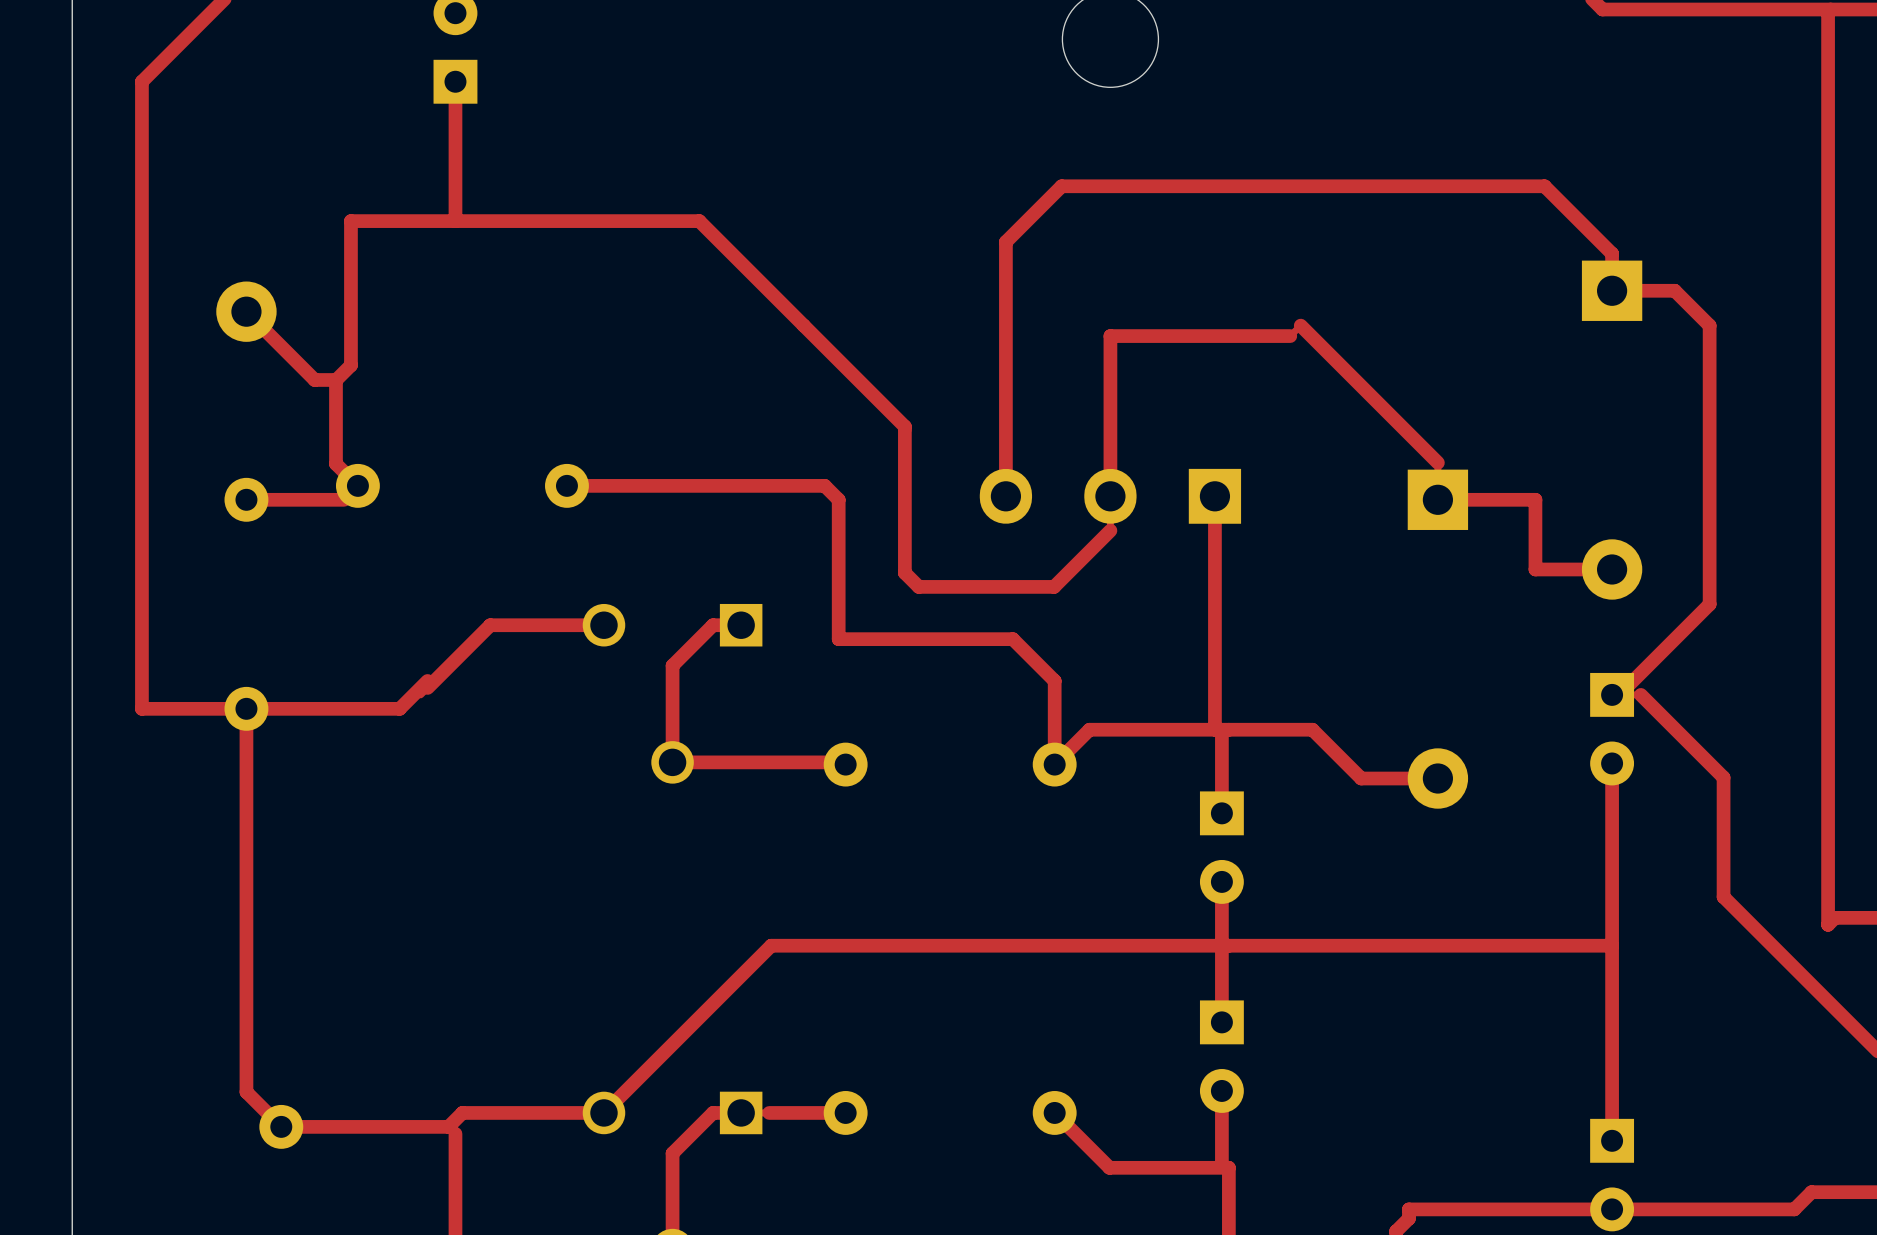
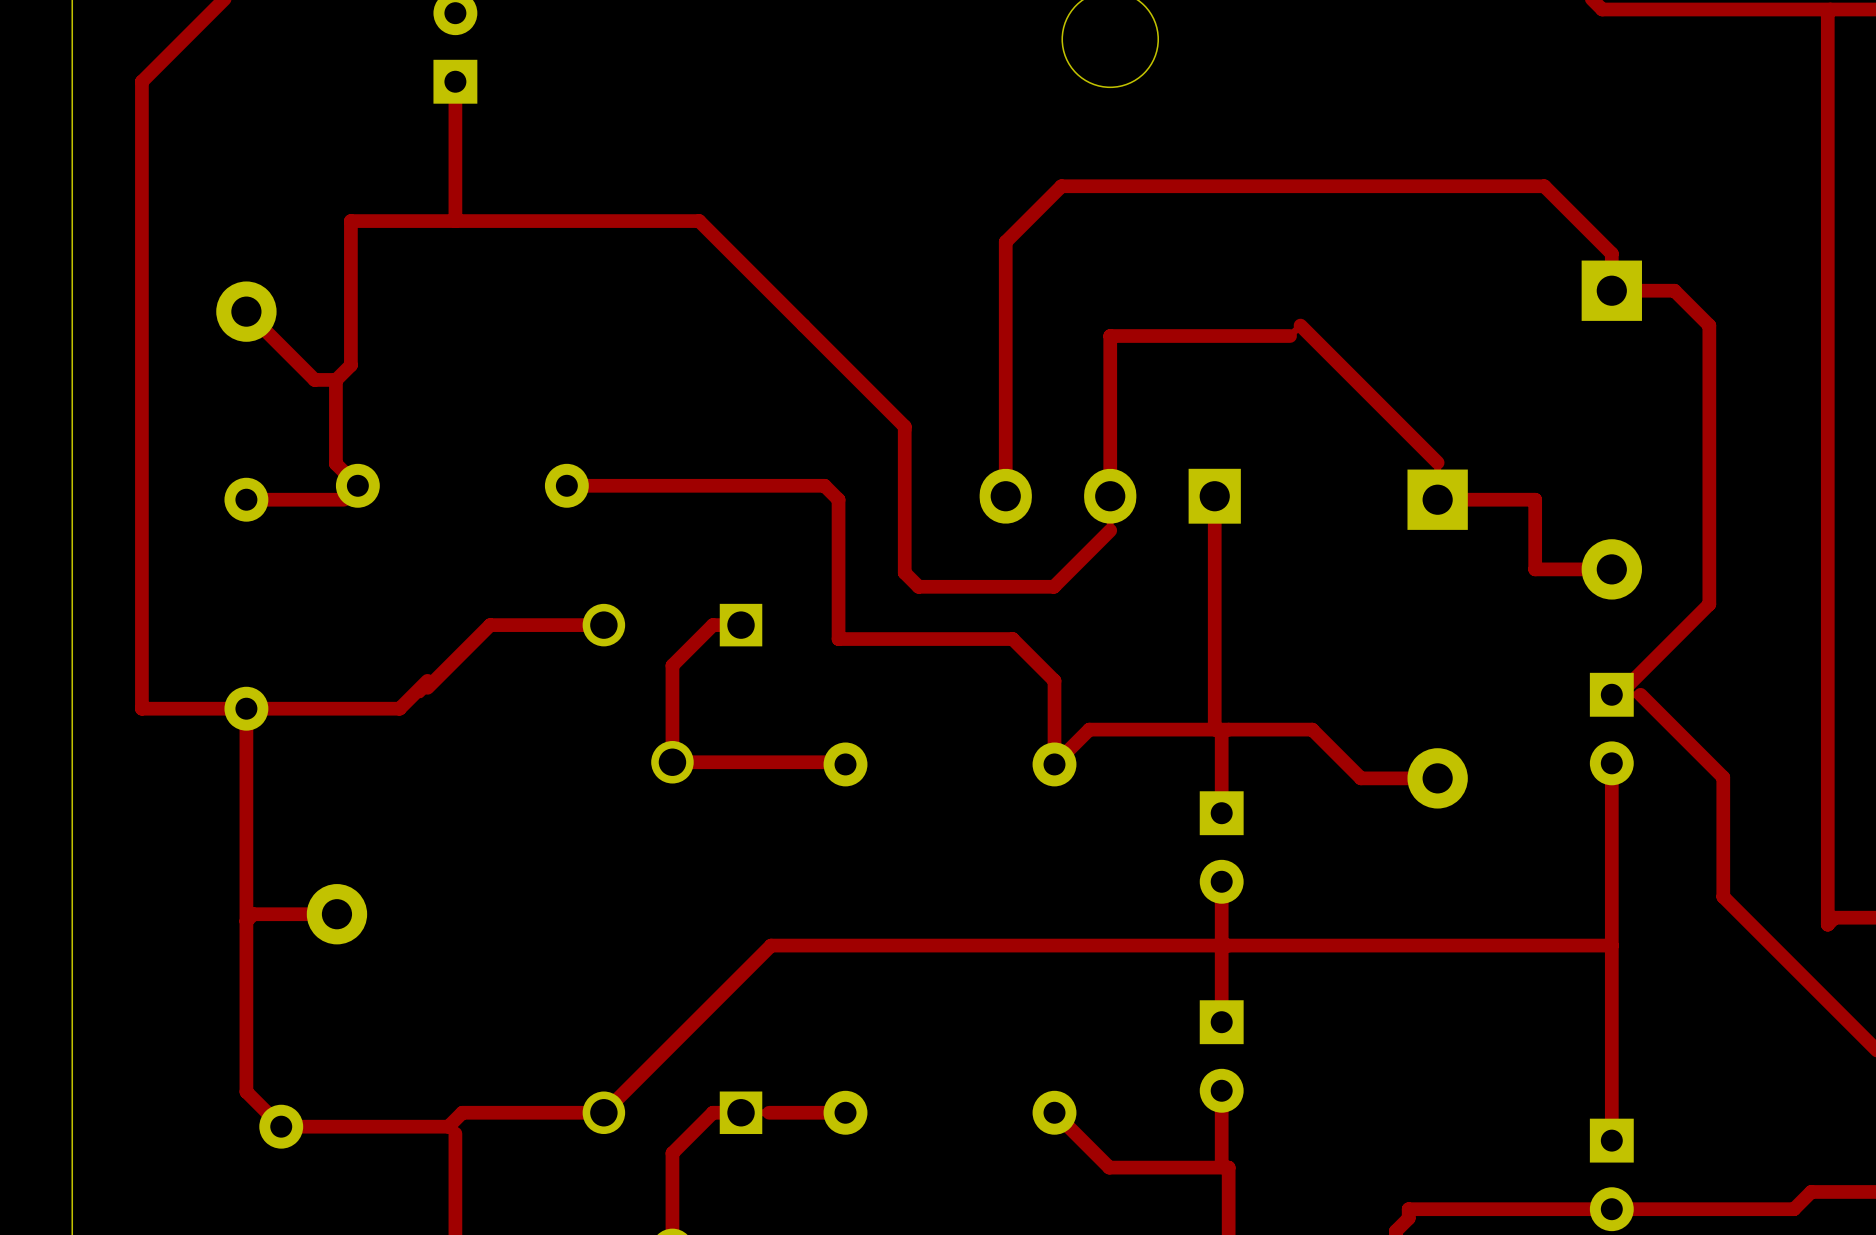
top track: none -> (336, 914) (253, 914) (246, 921)
part: none -> (336, 914)

